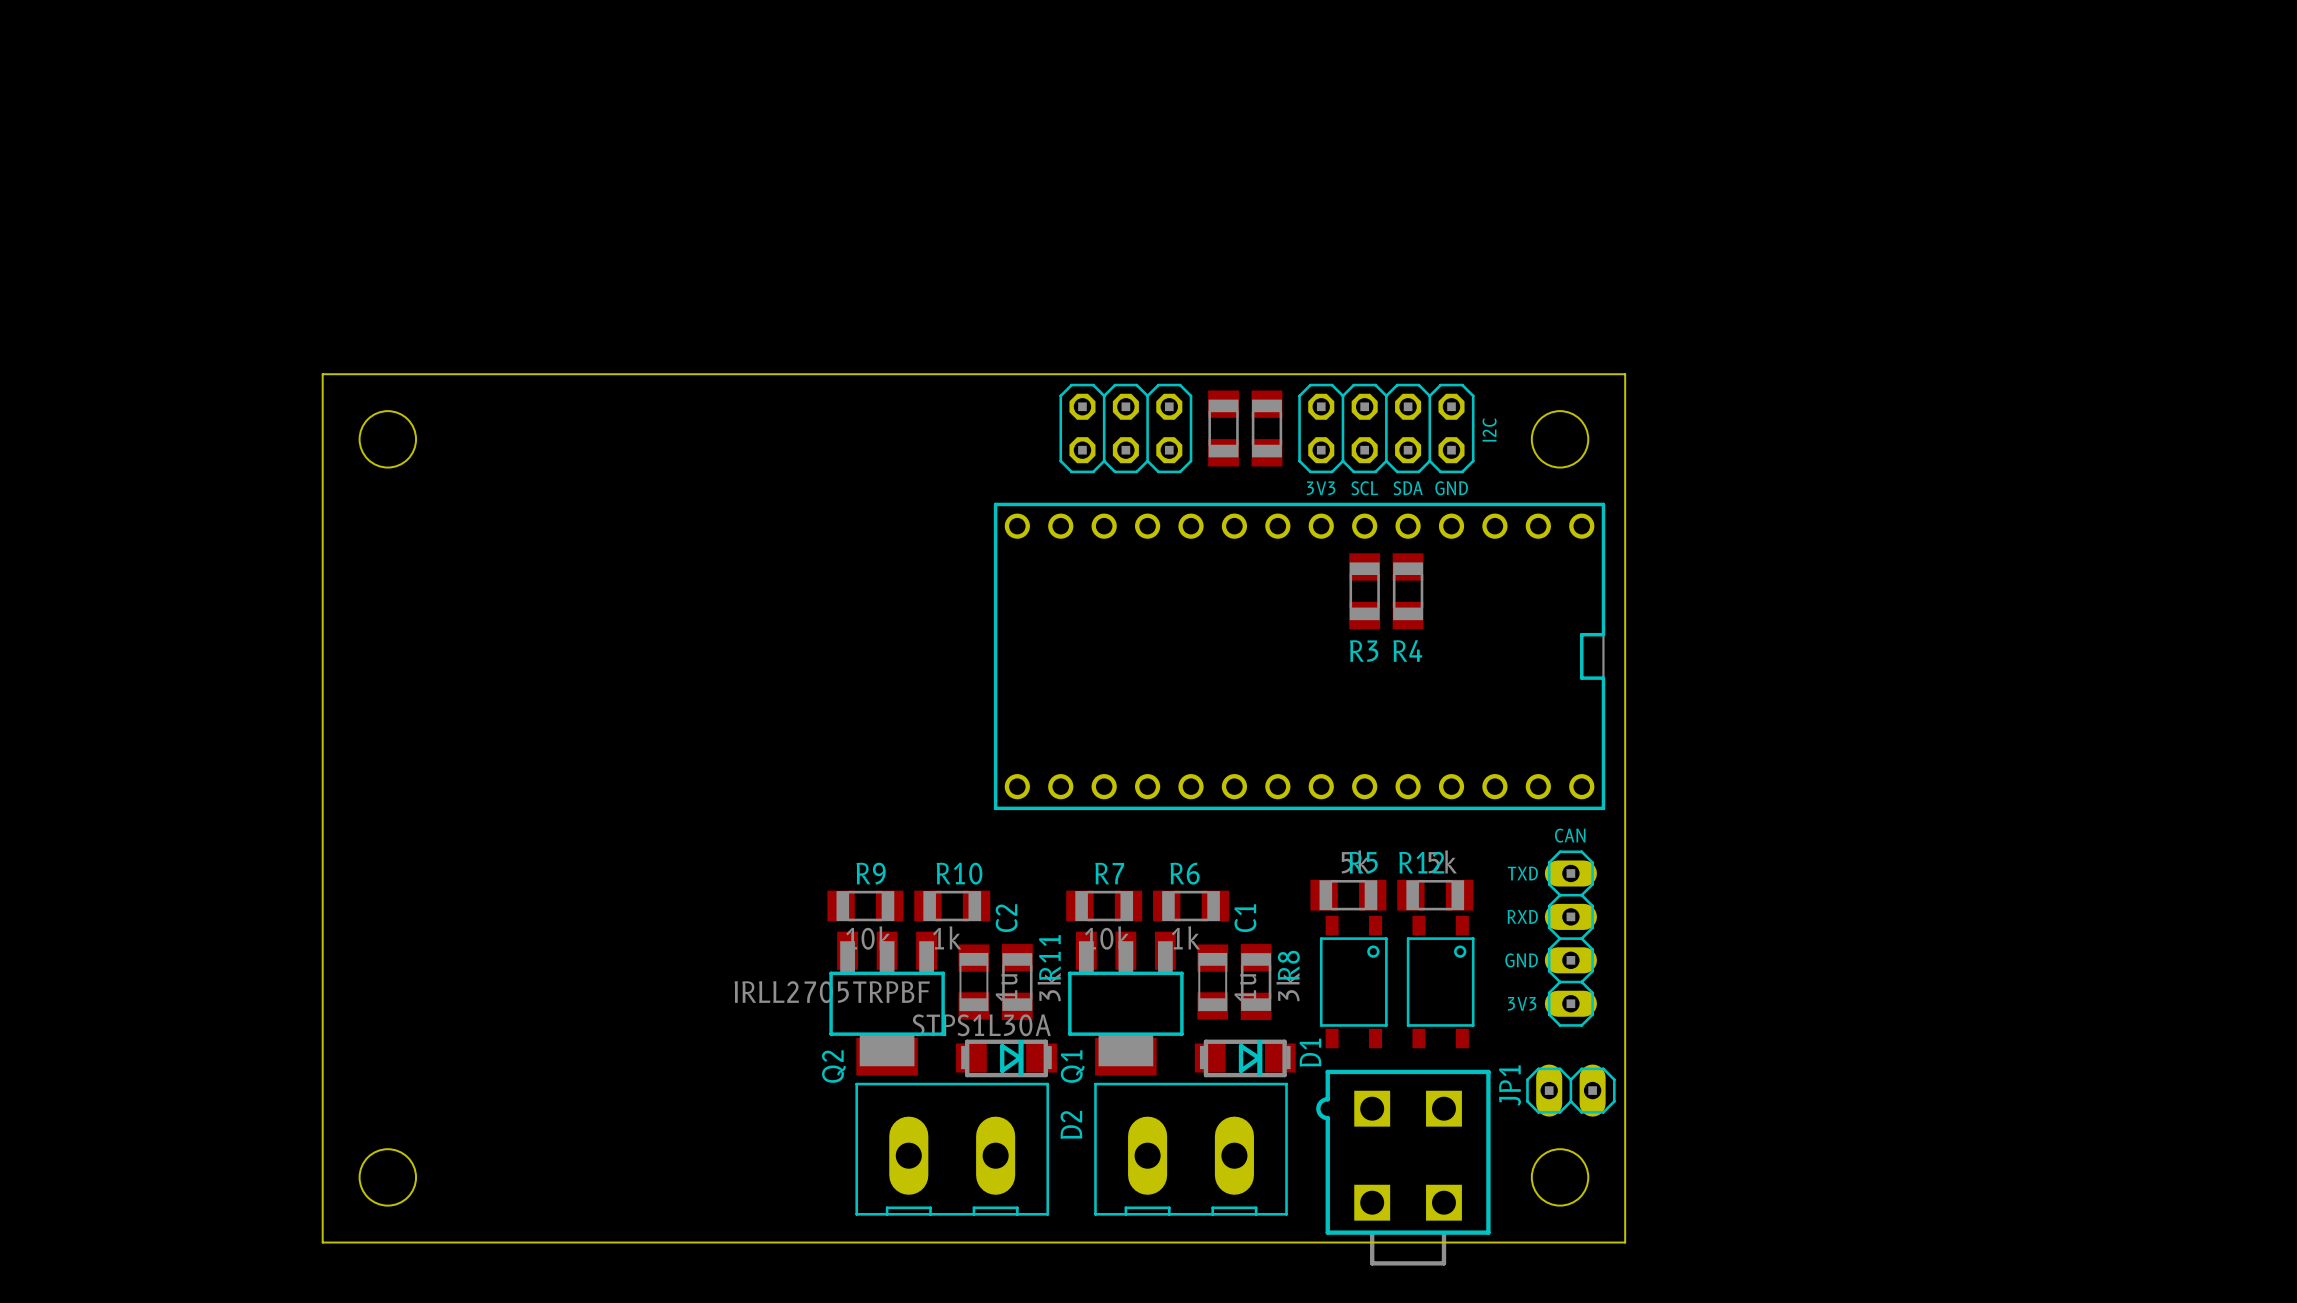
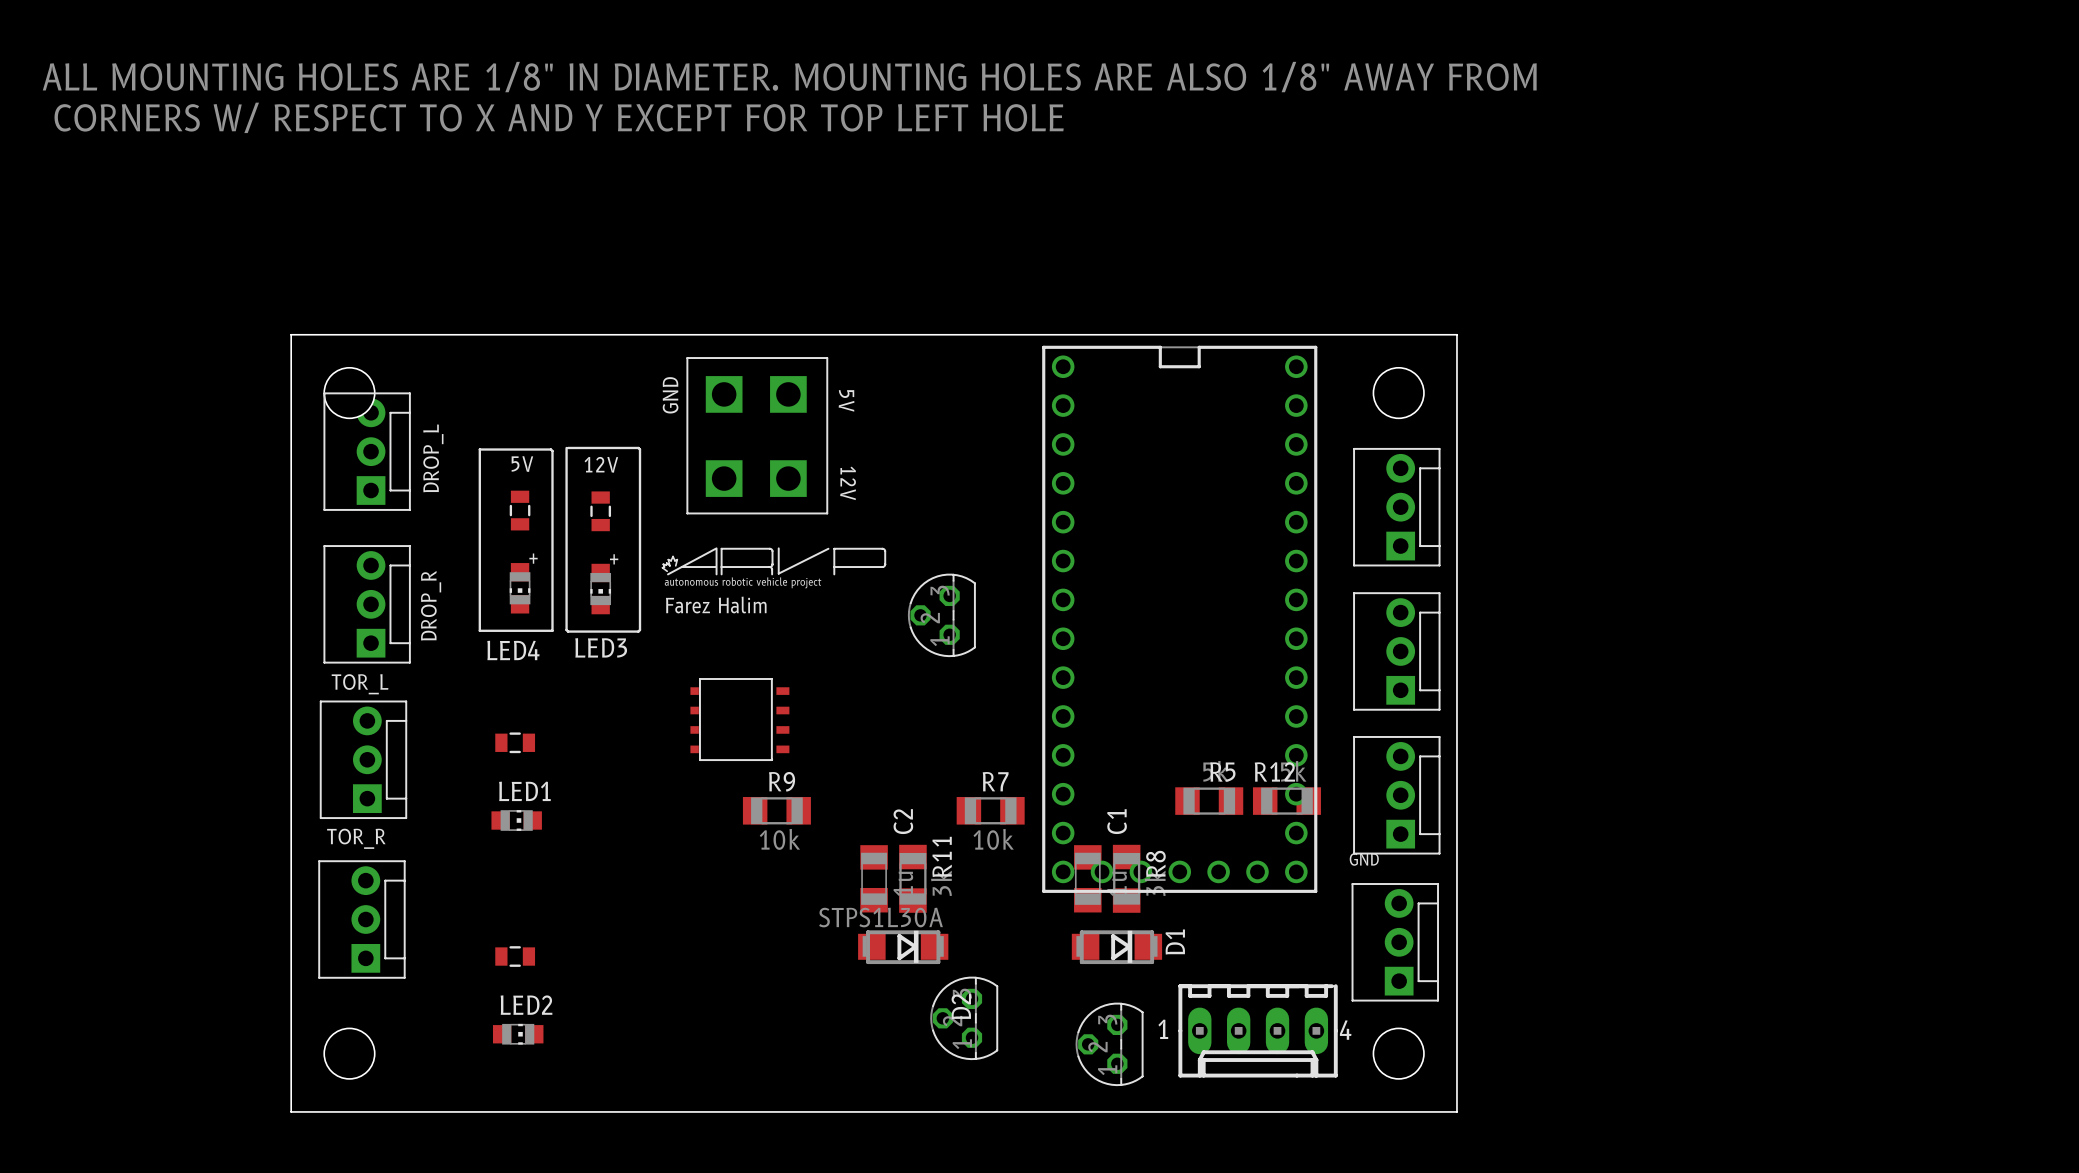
text: none -> ALL MOUNTING HOLES ARE 1/8" IN DIAMETER. MOUNTING HOLES ARE ALSO 1/8" AWAY FROM (789, 77)
text: none -> CORNERS W/ RESPECT TO X AND Y EXCEPT FOR TOP LEFT HOLE (559, 117)
part: (1125, 428) -> none
part: (1223, 428) -> none
part: (1266, 428) -> none
part: (1386, 428) -> none
text: I2C (1489, 430) -> none
text: none -> GND (670, 395)
text: none -> 5V (846, 400)
part: none -> (757, 435)
text: 3V3 (1321, 488) -> none
text: SCL (1364, 488) -> none
text: SDA (1408, 488) -> none
text: GND (1451, 488) -> none
line: none -> (566, 447) (566, 630) (638, 631) (640, 630) (640, 449) (568, 447)
line: none -> (479, 449) (552, 451) (552, 630) (479, 630) (479, 449)
part: none -> (367, 451)
text: none -> DROP_L (433, 458)
text: none -> 5V (522, 464)
text: none -> 12V (601, 464)
text: none -> 12V (848, 483)
part: none -> (1396, 507)
part: none -> (520, 510)
part: none -> (600, 511)
R3: (1364, 591) -> none
R4: (1408, 591) -> none
drawing: none -> [662, 547, 887, 576]
part: (1299, 656) -> none
LED4: none -> (520, 588)
LED3: none -> (600, 589)
part: none -> (367, 604)
text: none -> DROP_R (431, 605)
text: none -> Farez Halim (716, 605)
part: none -> (941, 615)
part: none -> (1179, 619)
part: none -> (1396, 651)
text: none -> TOR_L (360, 684)
part: none -> (739, 719)
part: none -> (515, 742)
text: CAN (1570, 835) -> none
part: none -> (363, 759)
text: TXD (1522, 873) -> none
part: none -> (1396, 795)
R10: 1k (952, 906) -> none
R6: 1k (1191, 906) -> none
LED1: none -> (516, 820)
text: RXD (1522, 916) -> none
text: none -> TOR_R (356, 838)
part: (1570, 938) -> none
part: (1353, 982) -> none
part: (1440, 982) -> none
Q2: IRLL2705TRPBF (887, 1003) -> none
Q1: (1125, 1003) -> none
text: 3V3 (1522, 1003) -> none
part: none -> (361, 919)
part: none -> (1395, 942)
part: none -> (515, 956)
part footprint: [1316, 1069, 1491, 1266] -> [1178, 984, 1338, 1078]
JP1: (1570, 1090) -> none
part: none -> (964, 1018)
part: (952, 1149) -> none
part: (1191, 1149) -> none
LED2: none -> (518, 1034)
part: none -> (1109, 1044)

